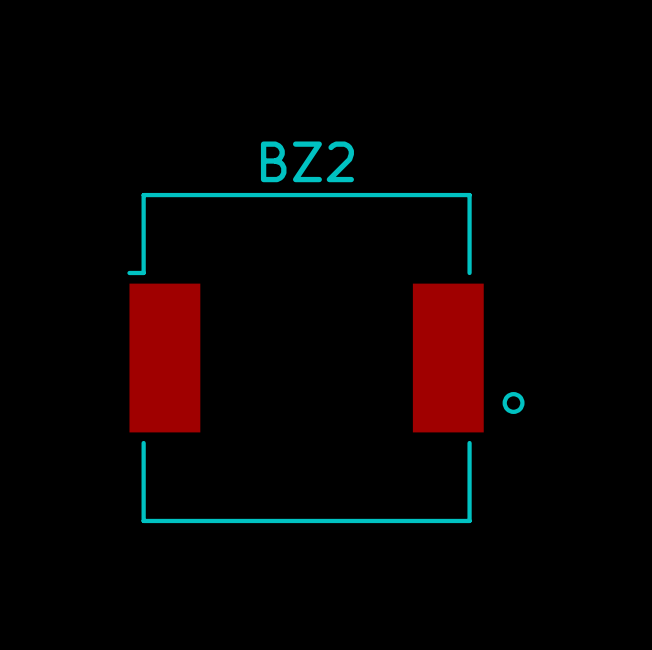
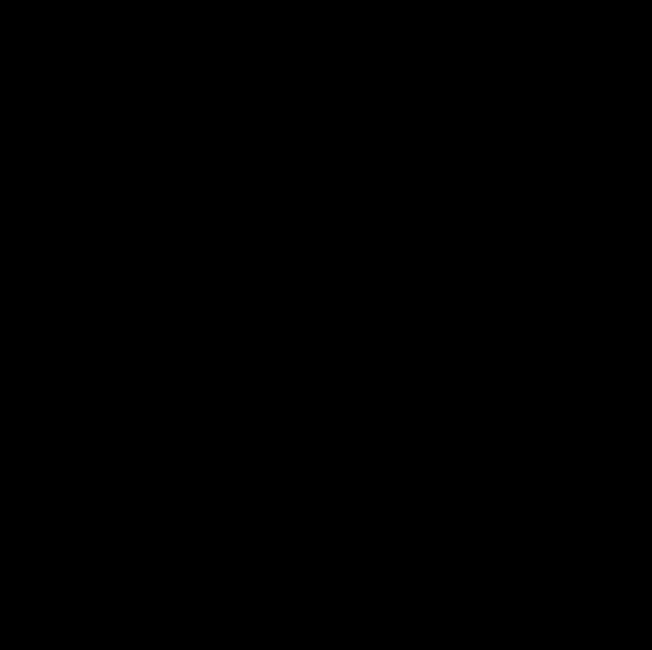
BZ2: (305, 358) -> none
drawing: [502, 392, 525, 414] -> none

